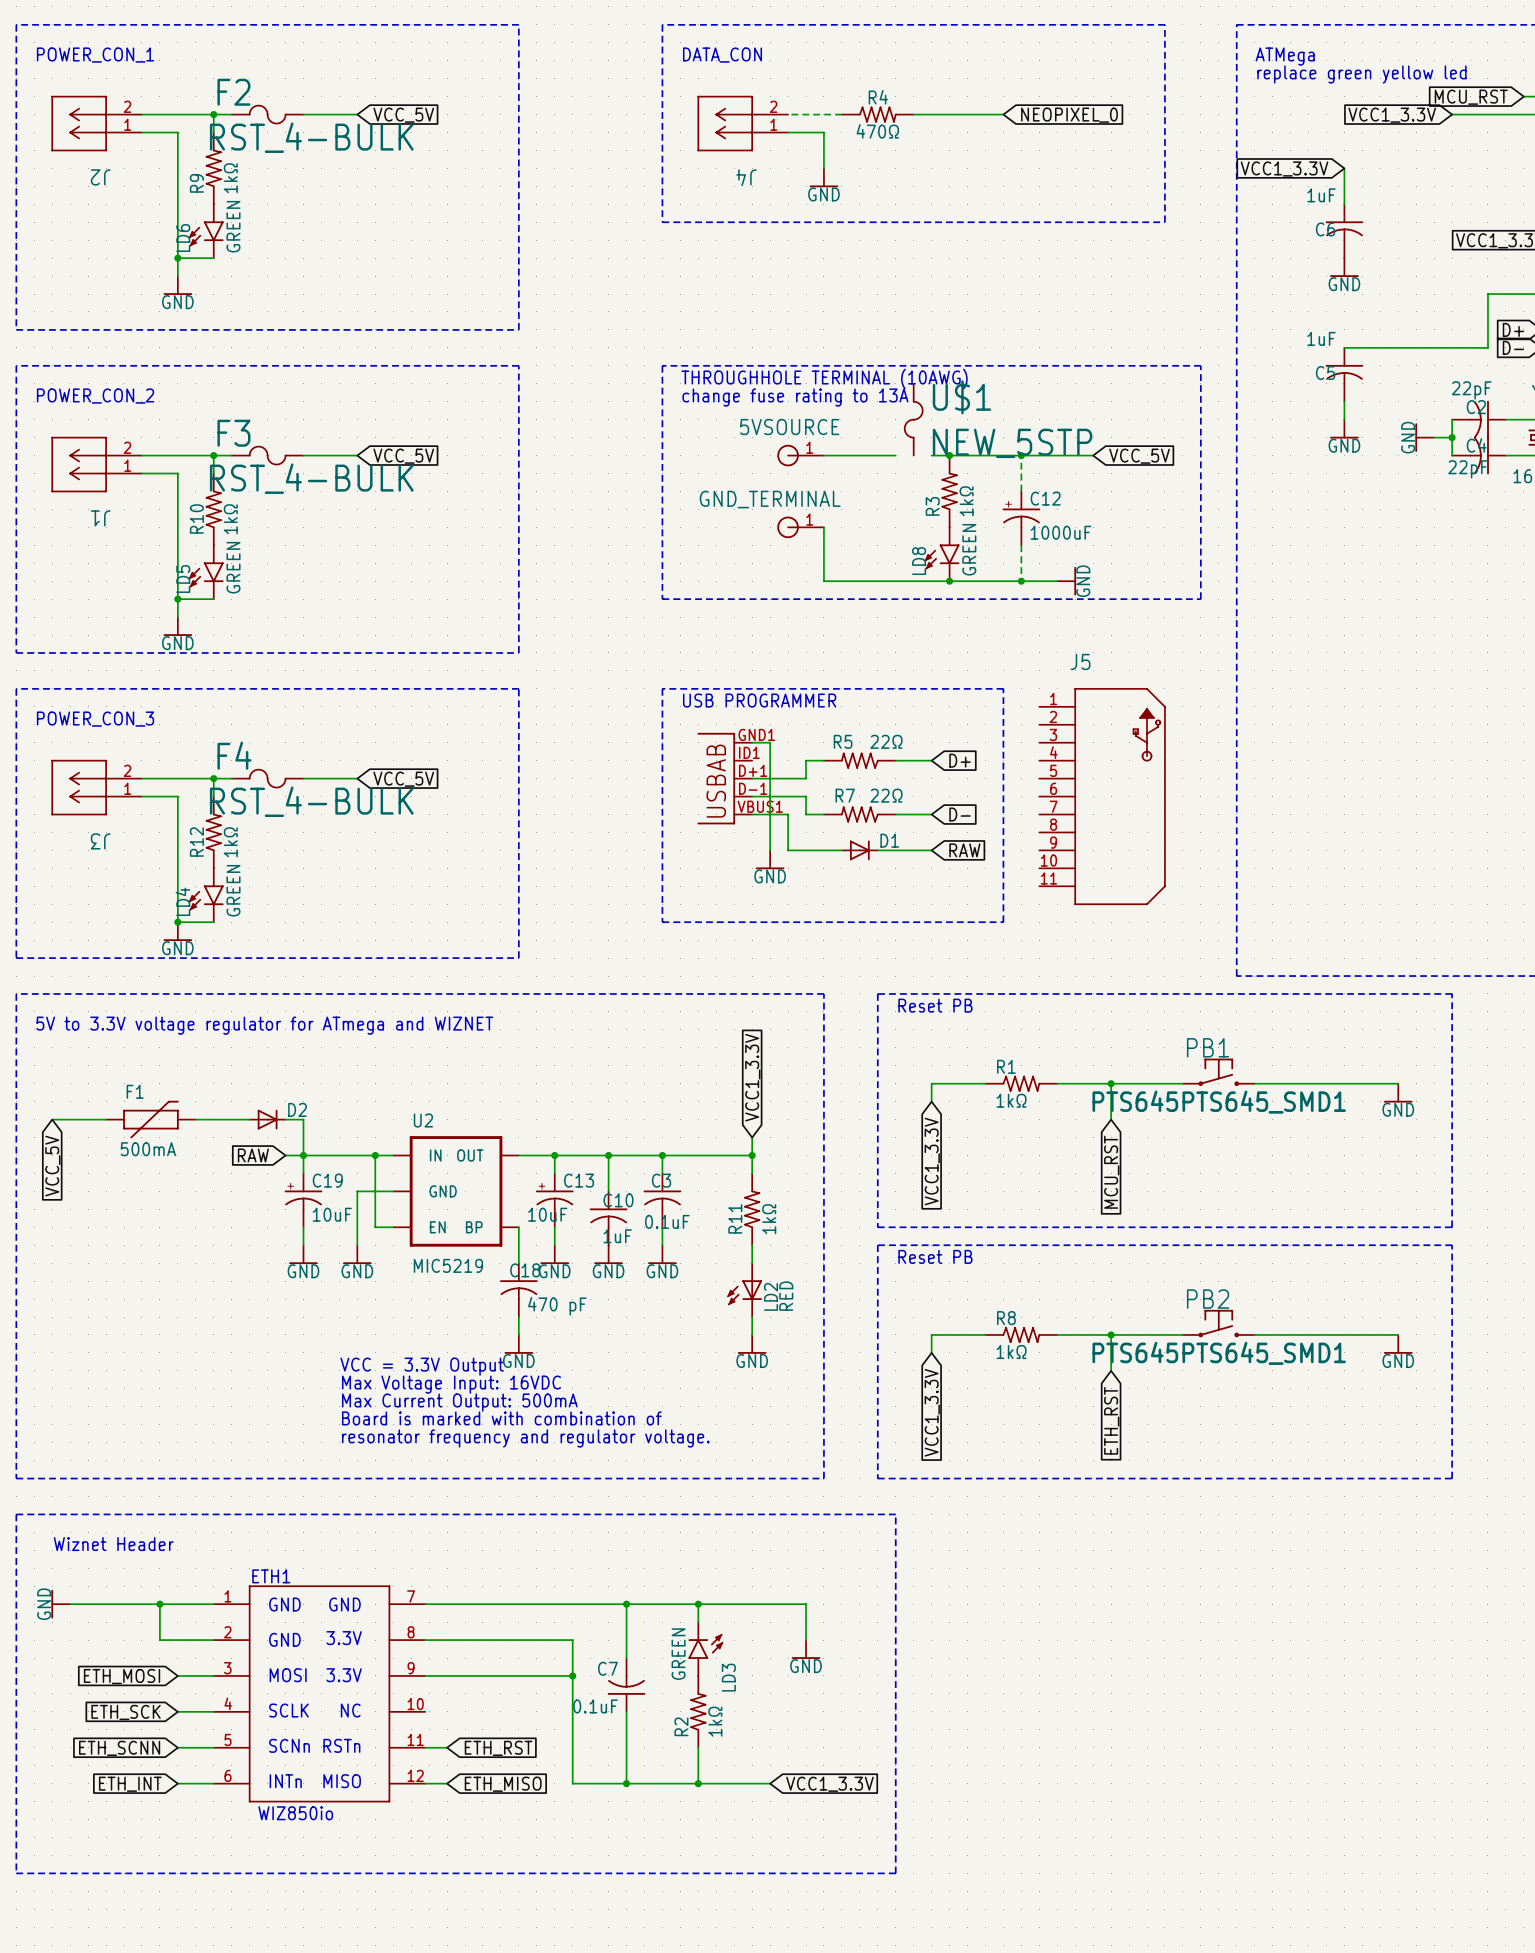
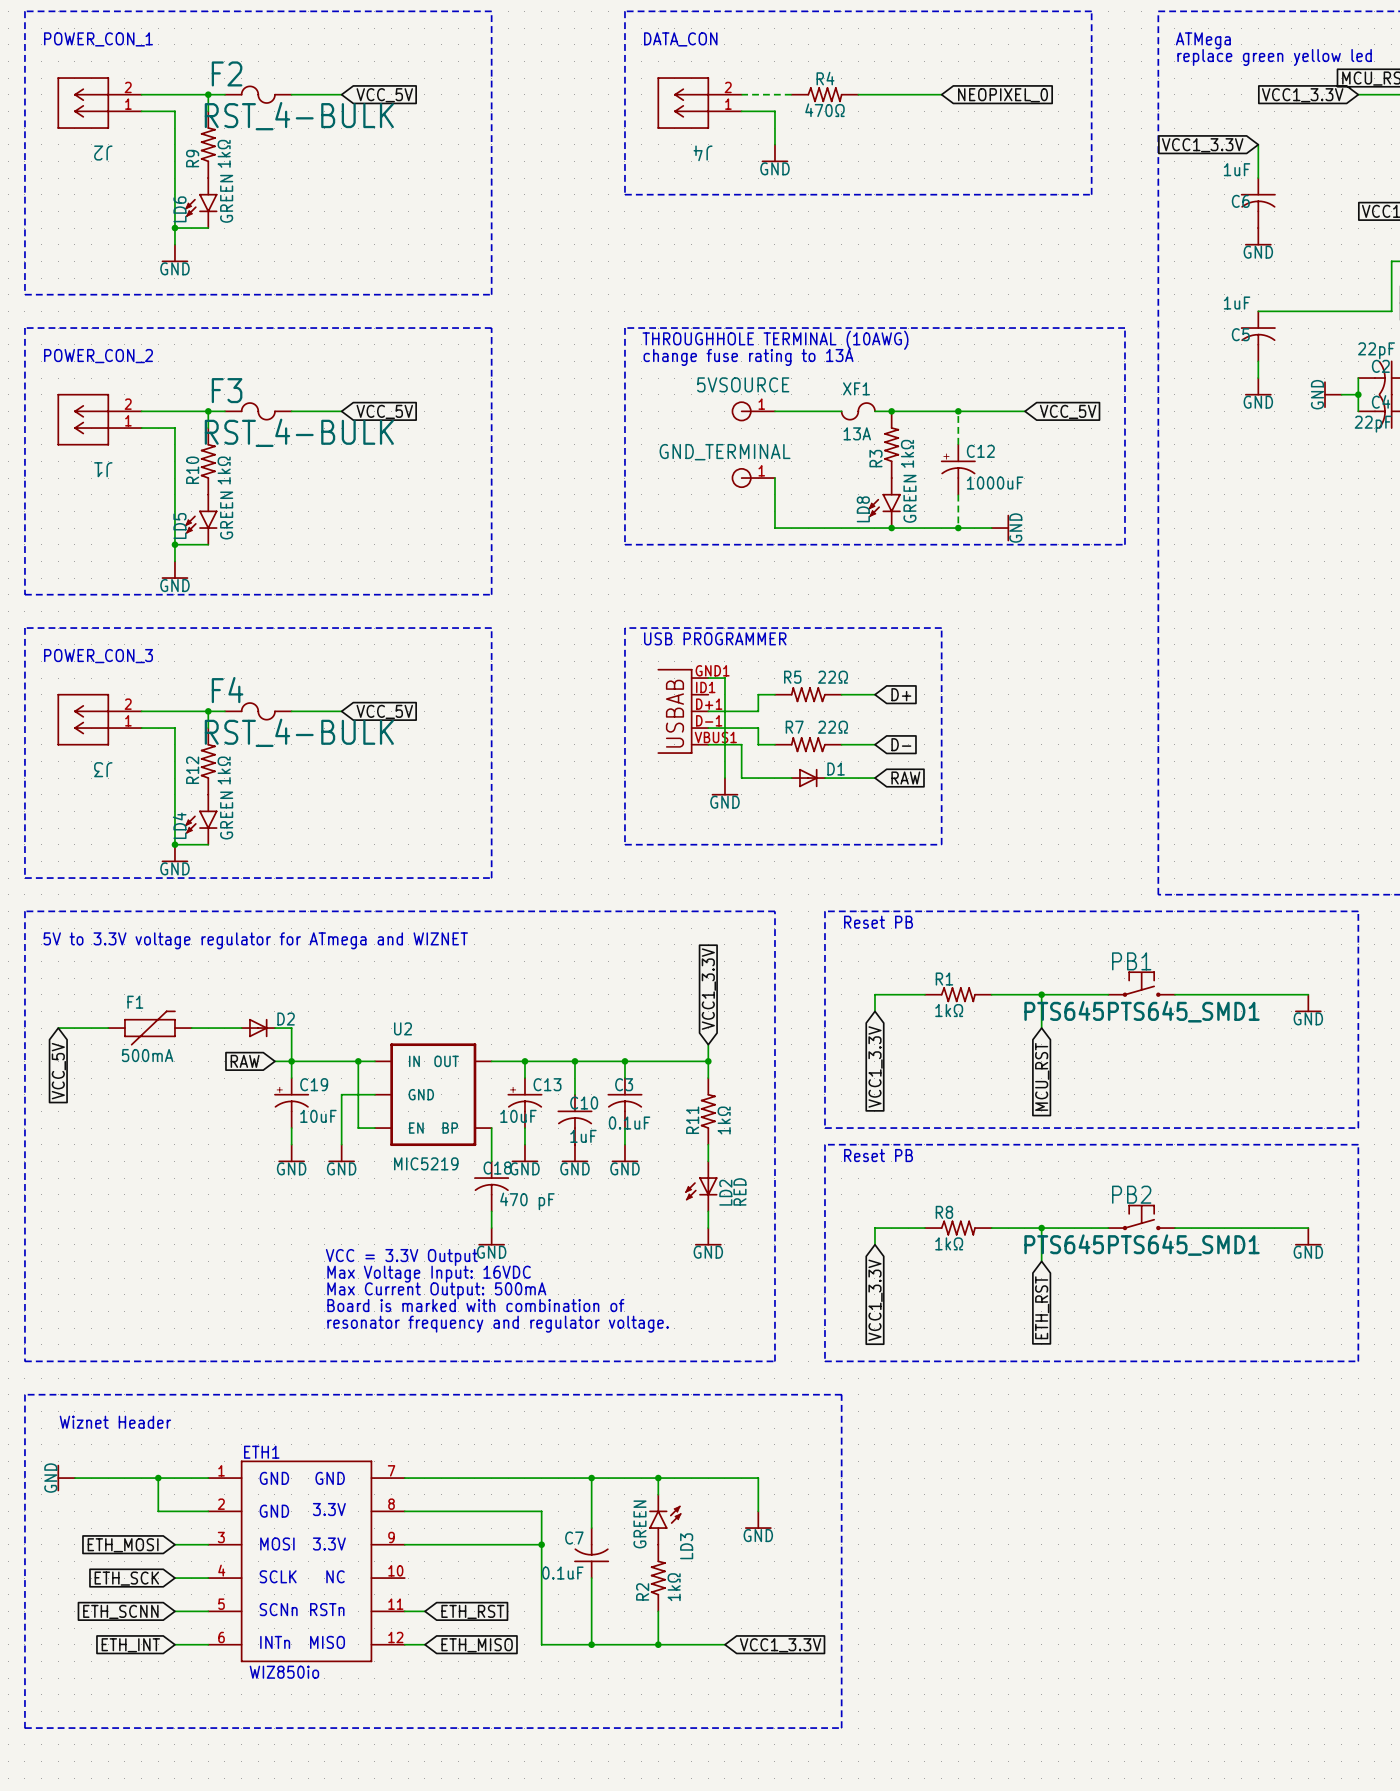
U$1: NEW_5STP (913, 419) -> none
XF1: none -> 13A (858, 411)
J5: (1102, 796) -> none

